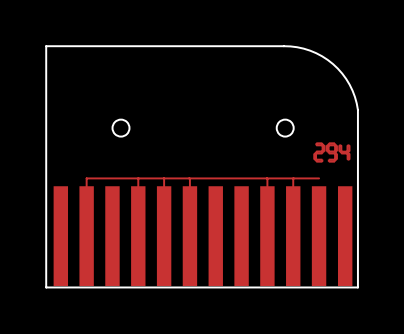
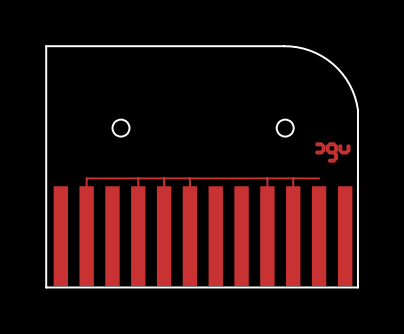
zone outline: (314, 153) (314, 159) (316, 159) (316, 153) (314, 153) -> none
zone outline: (347, 153) (349, 153) (349, 159) (347, 159) (347, 153) -> none
zone outline: (316, 159) (322, 159) (322, 161) (316, 161) (316, 159) -> none

